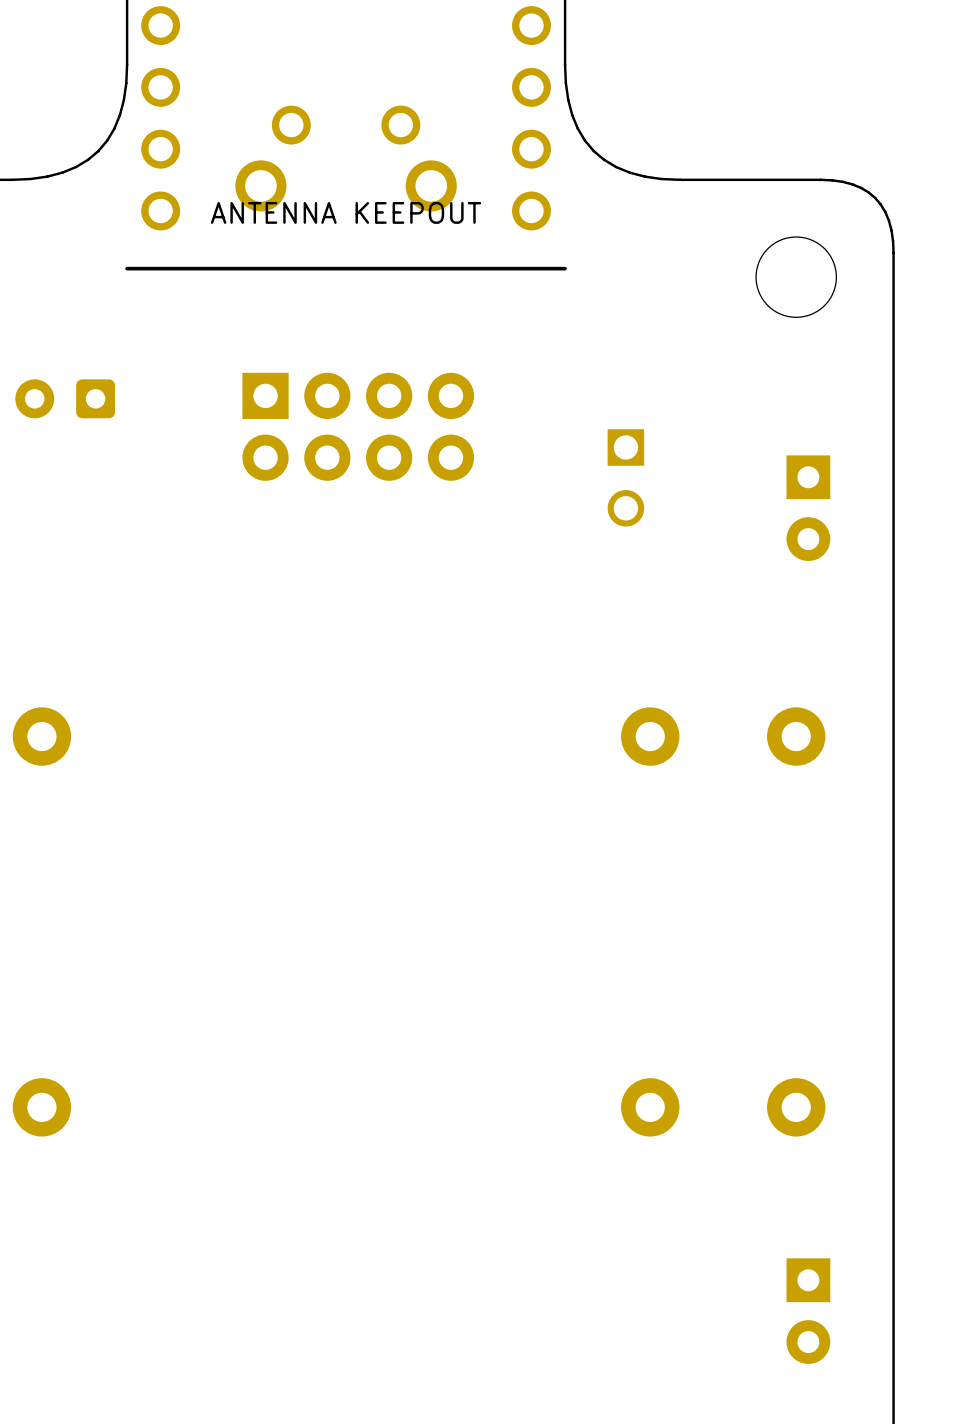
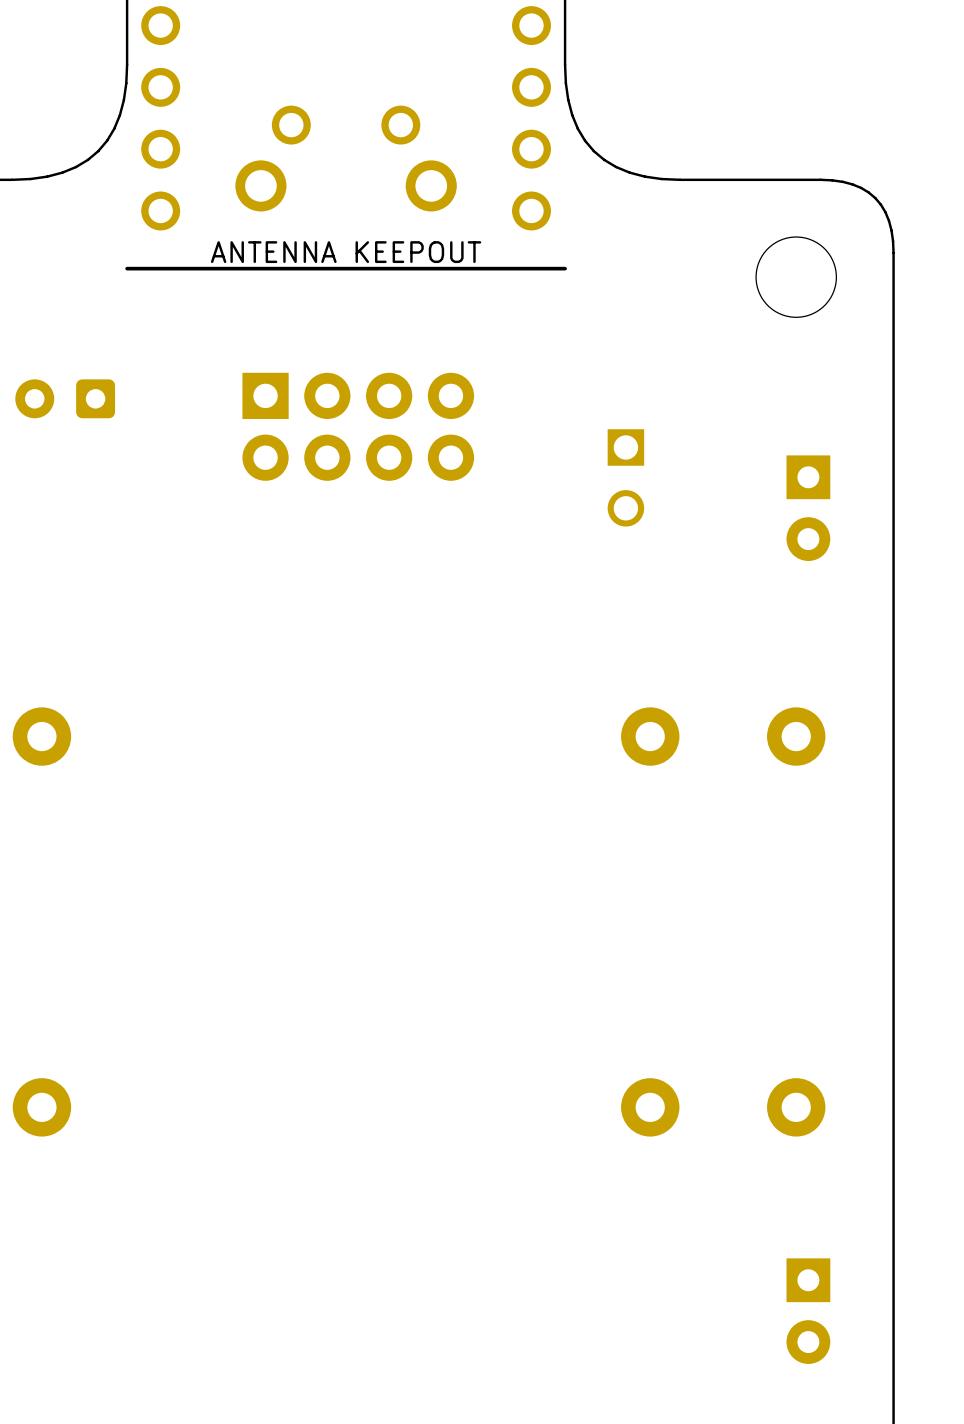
part text position: ANTENNA KEEPOUT (346, 212) -> ANTENNA KEEPOUT (346, 252)

